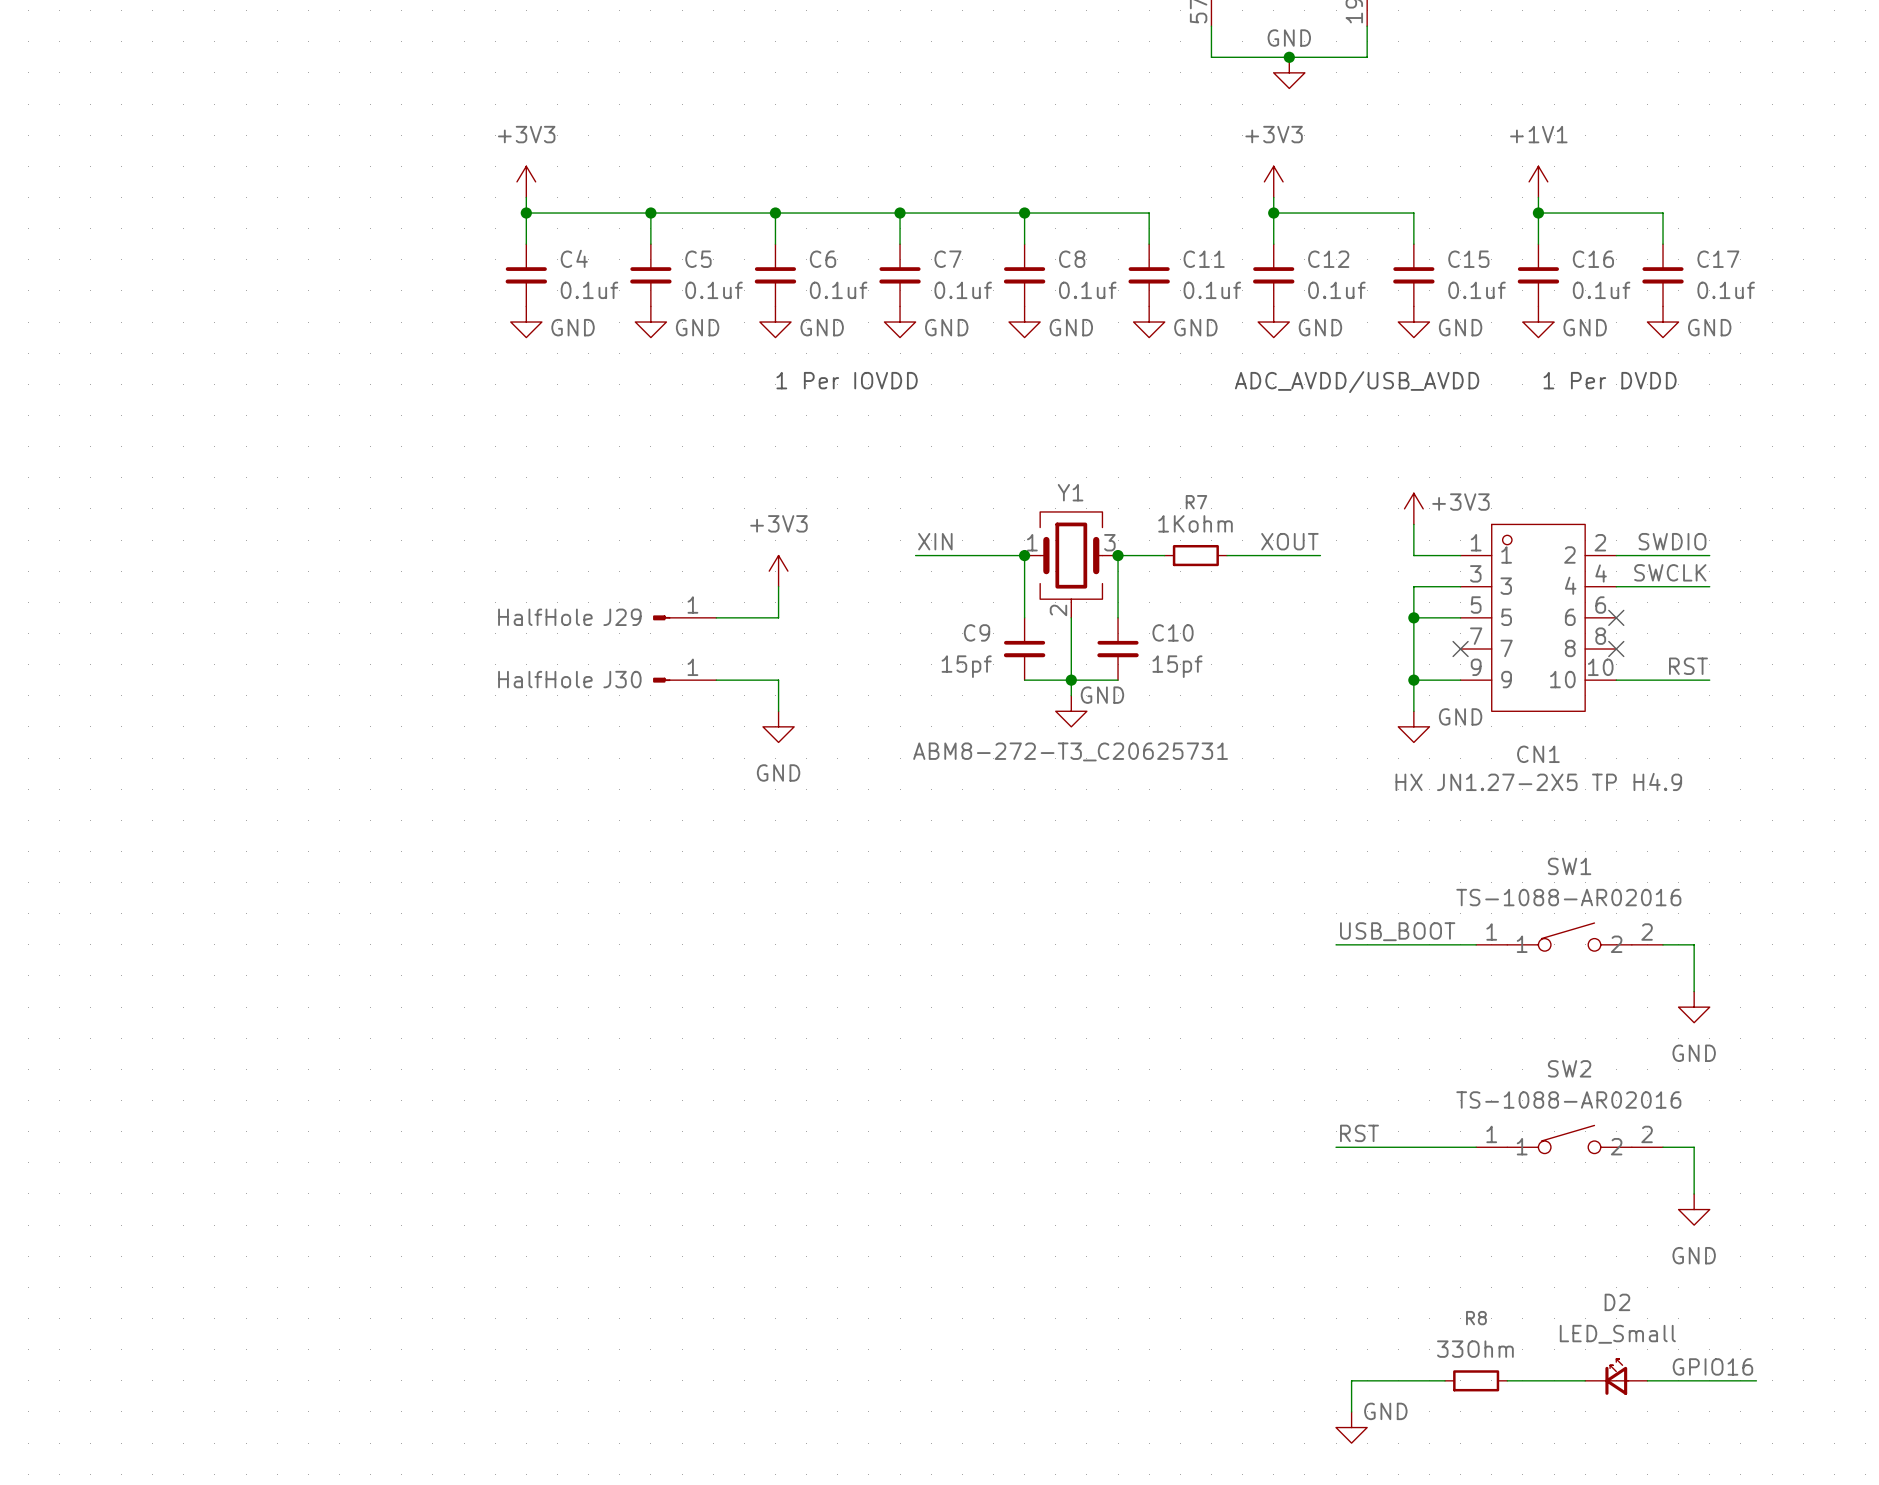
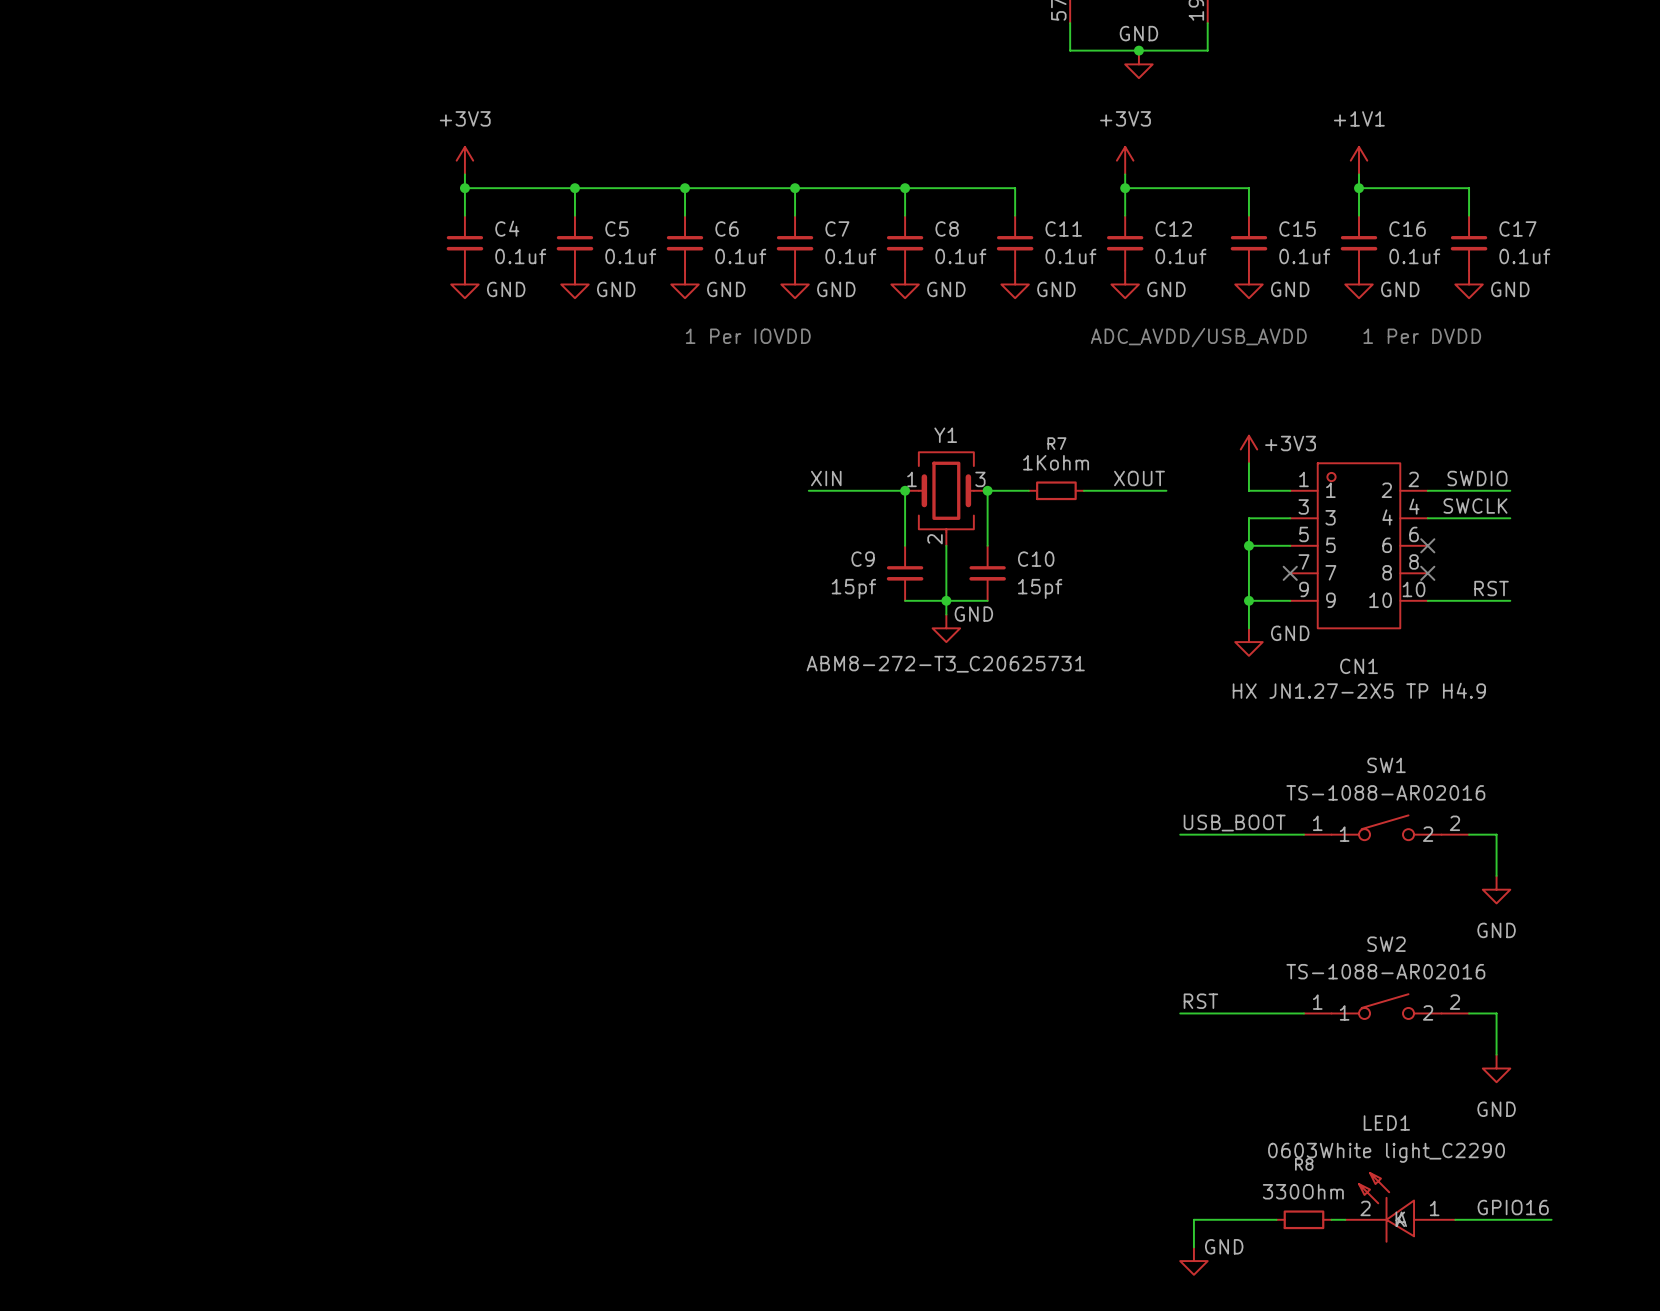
power symbol: +3V3 (778, 571) -> none
wire: (778, 586) (778, 617) (716, 617) -> none
J29: HalfHole (684, 617) -> none
J30: HalfHole (684, 680) -> none
wire: (716, 680) (778, 680) (778, 711) -> none
power symbol: GND (778, 726) -> none
R8 value: 33Ohm (1475, 1349) -> 330Ohm (1303, 1191)
LED1: none -> 0603White light_C2290 (1400, 1207)
D2: LED_Small (1616, 1376) -> none

